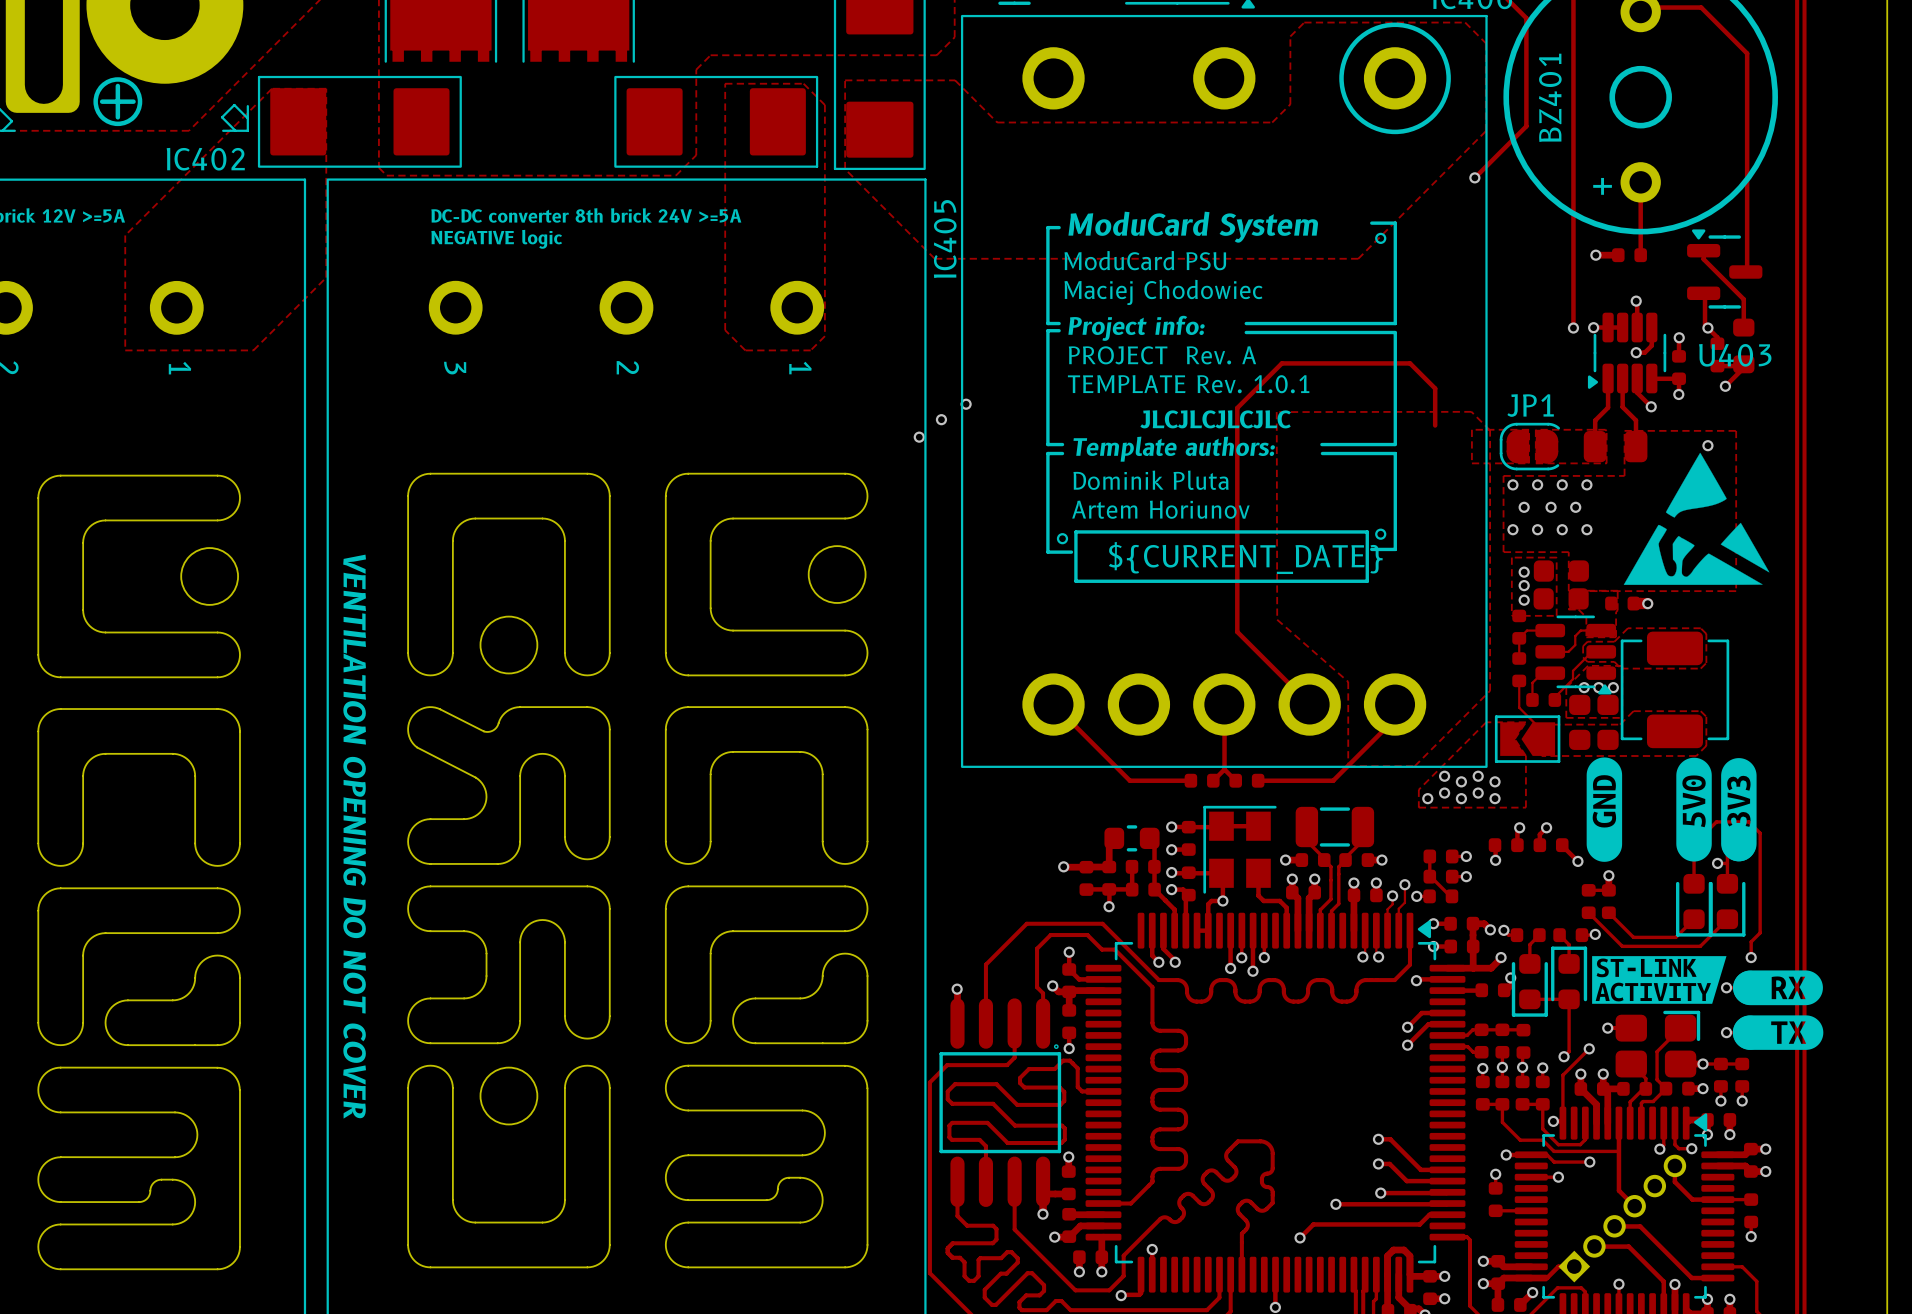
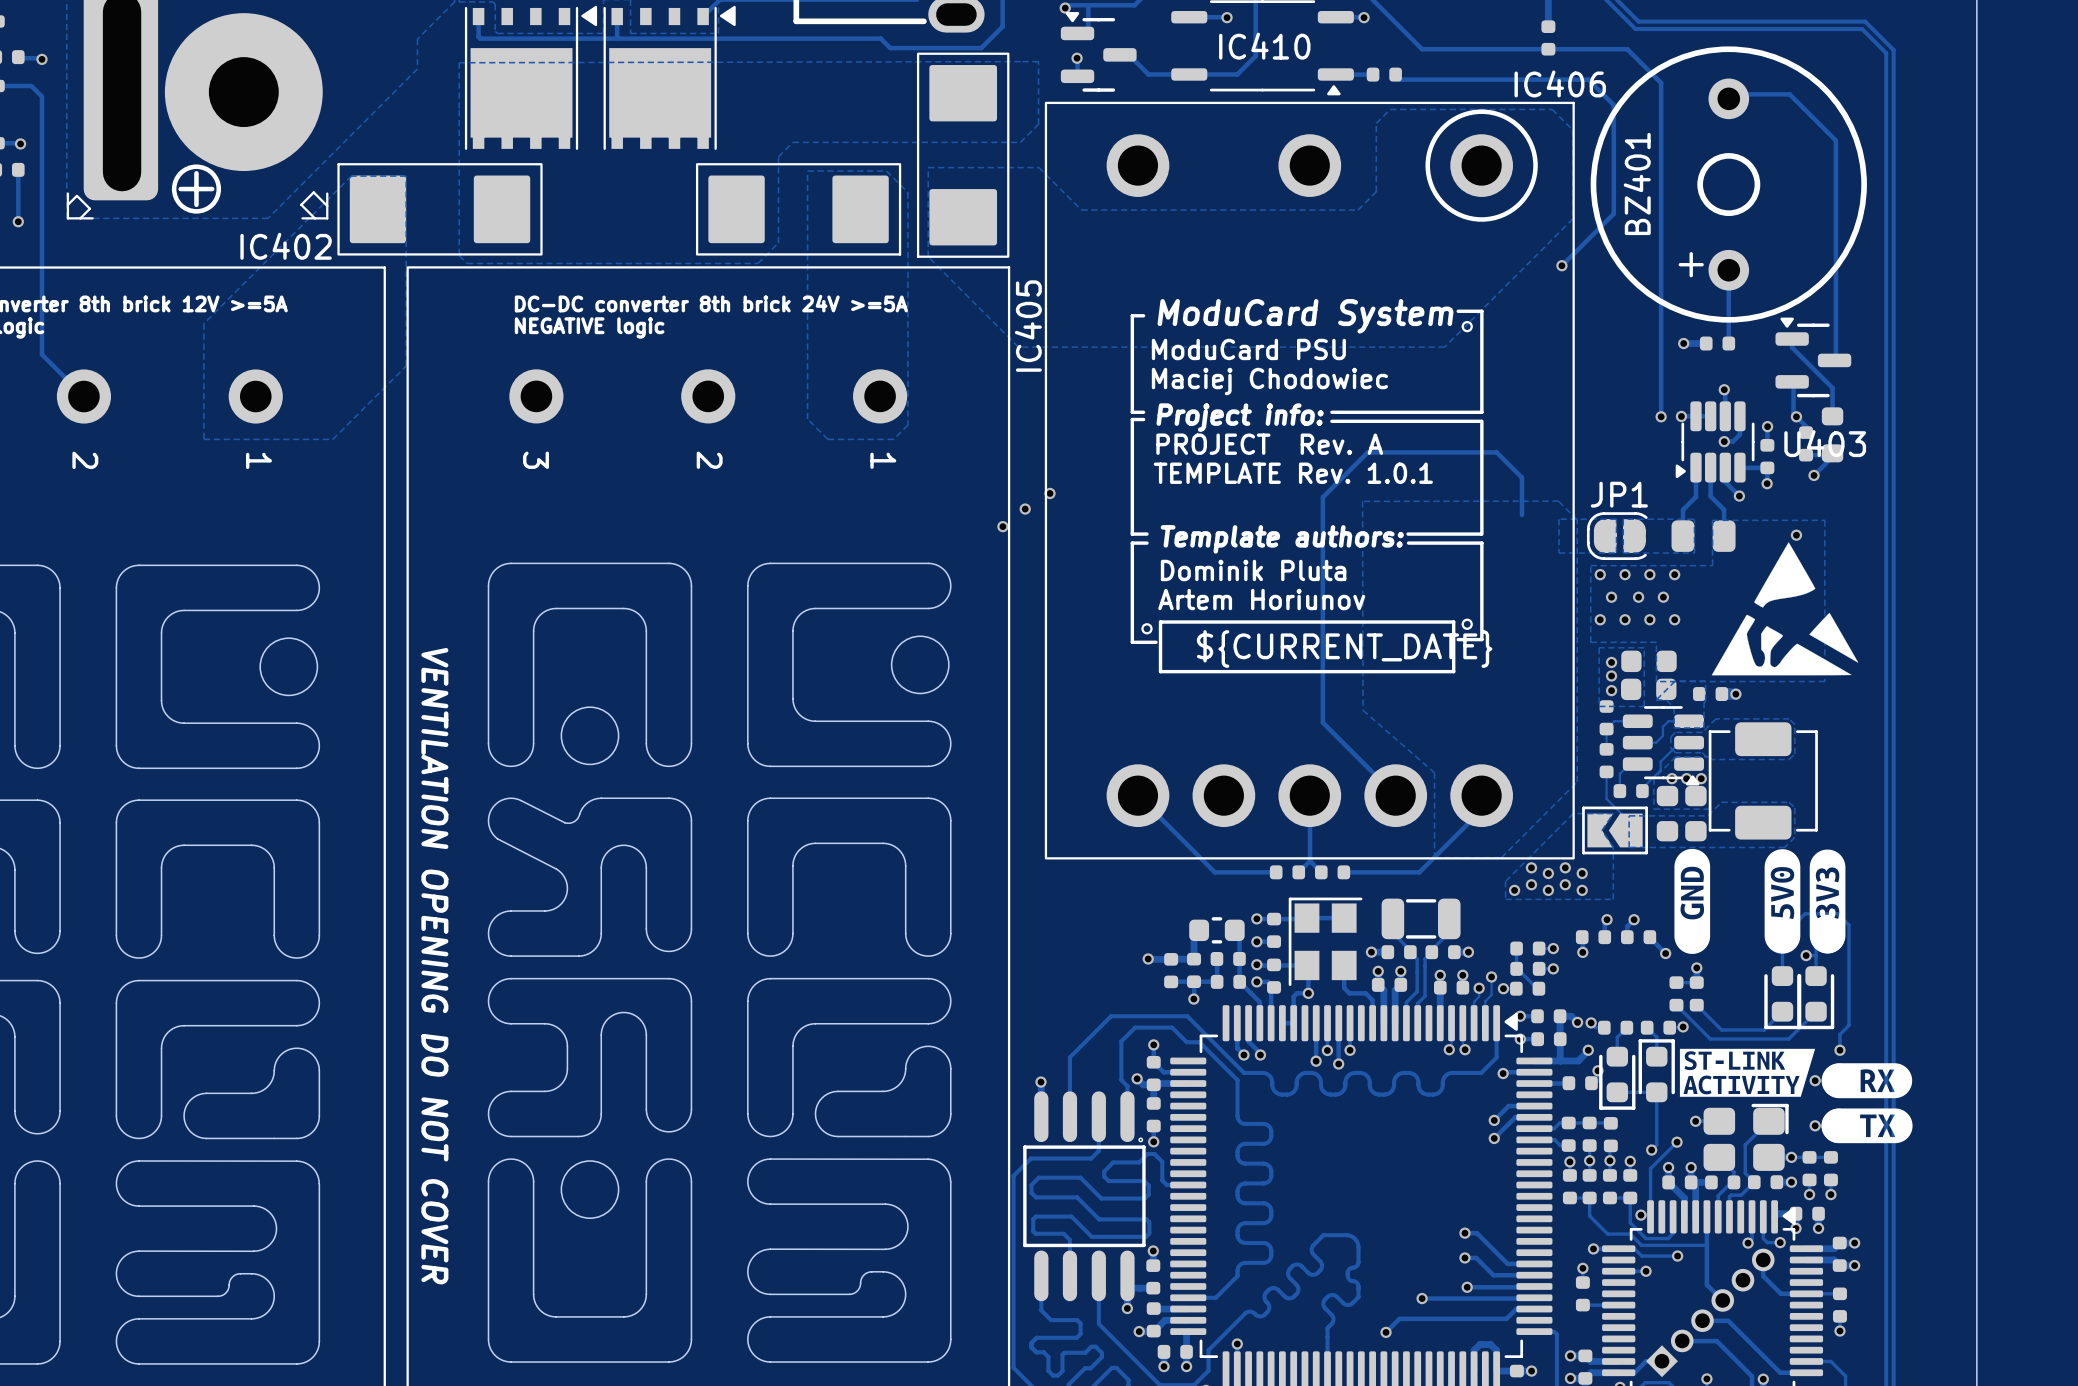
drawing: [1140, 410, 1291, 429] -> none

